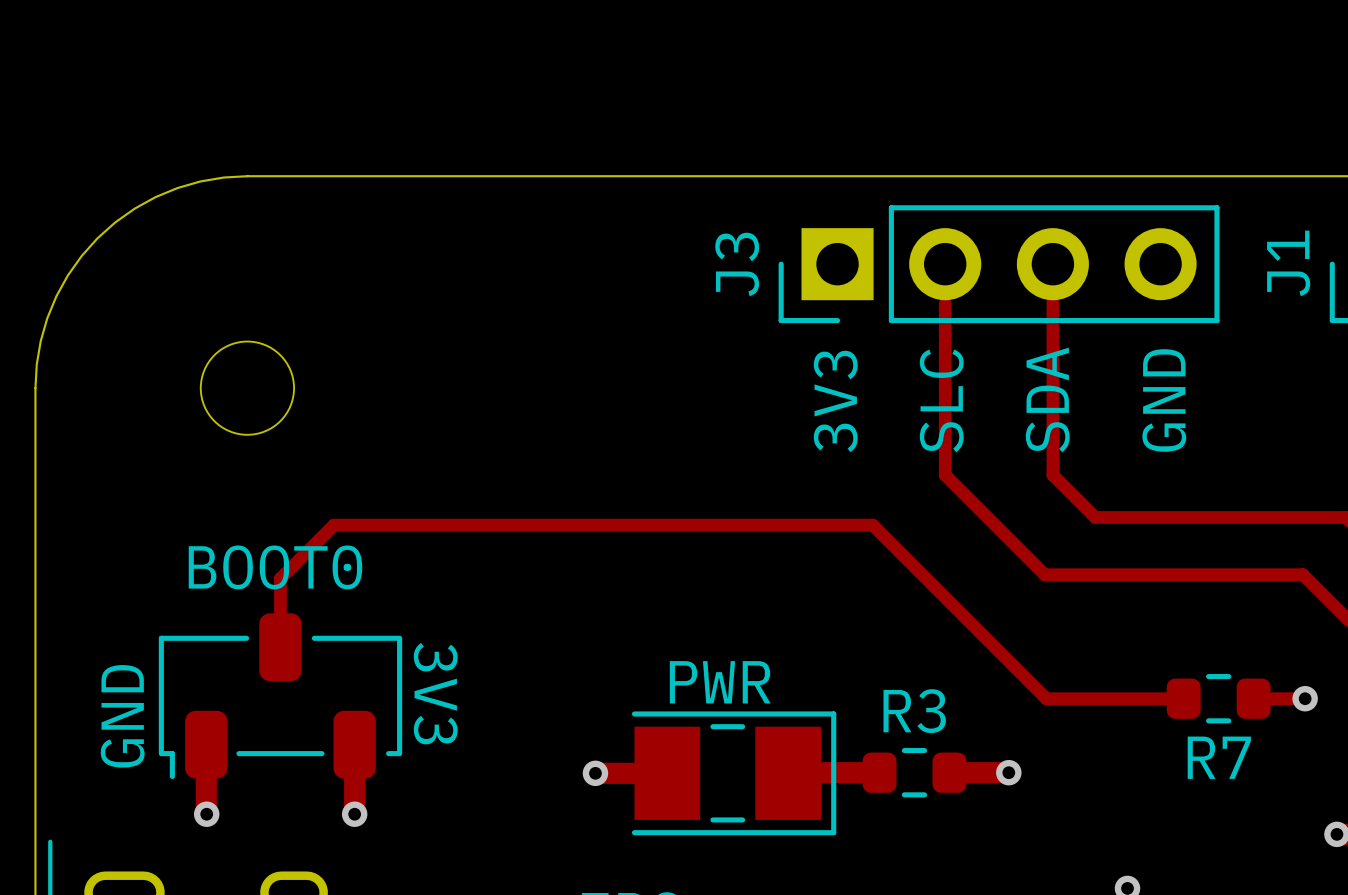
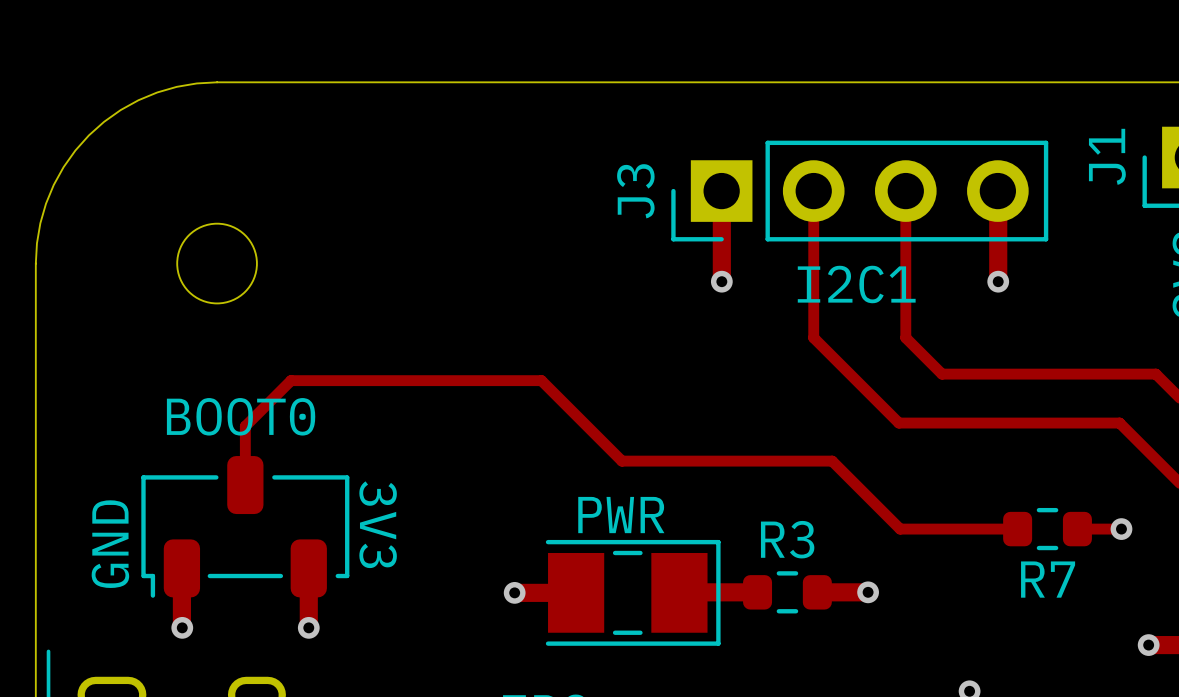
J3 position: (999, 264) -> (859, 191)
track: none -> (721, 191) (721, 281)
track: none -> (998, 191) (998, 281)
text: SDA (1047, 399) -> none
text: SLC (941, 400) -> none
text: GND (1164, 400) -> none
text: 3V3 (835, 401) -> none
via: none -> (721, 281)
via: none -> (998, 281)
text: none -> I2C1 (856, 284)
track: (626, 525) (872, 525) (966, 619) -> (541, 380) (621, 461) (832, 461)

